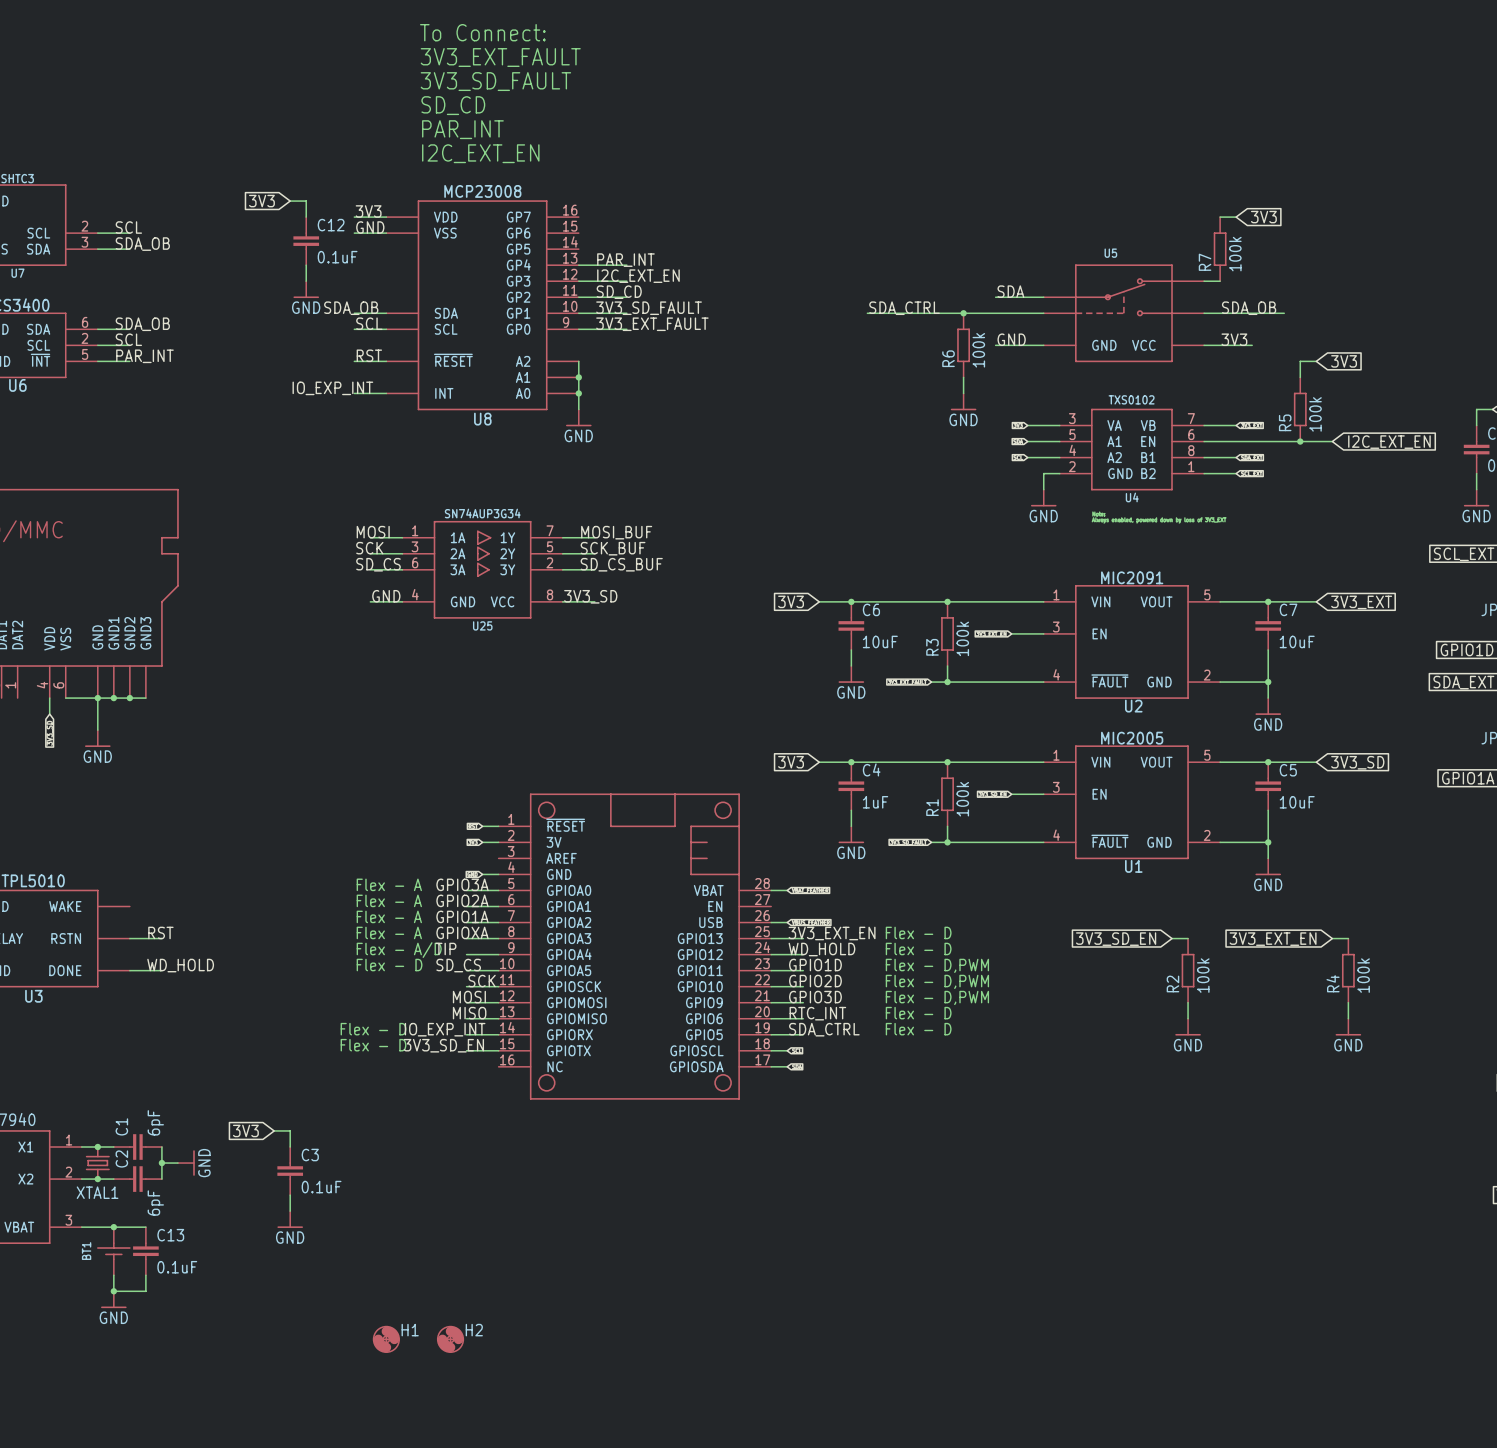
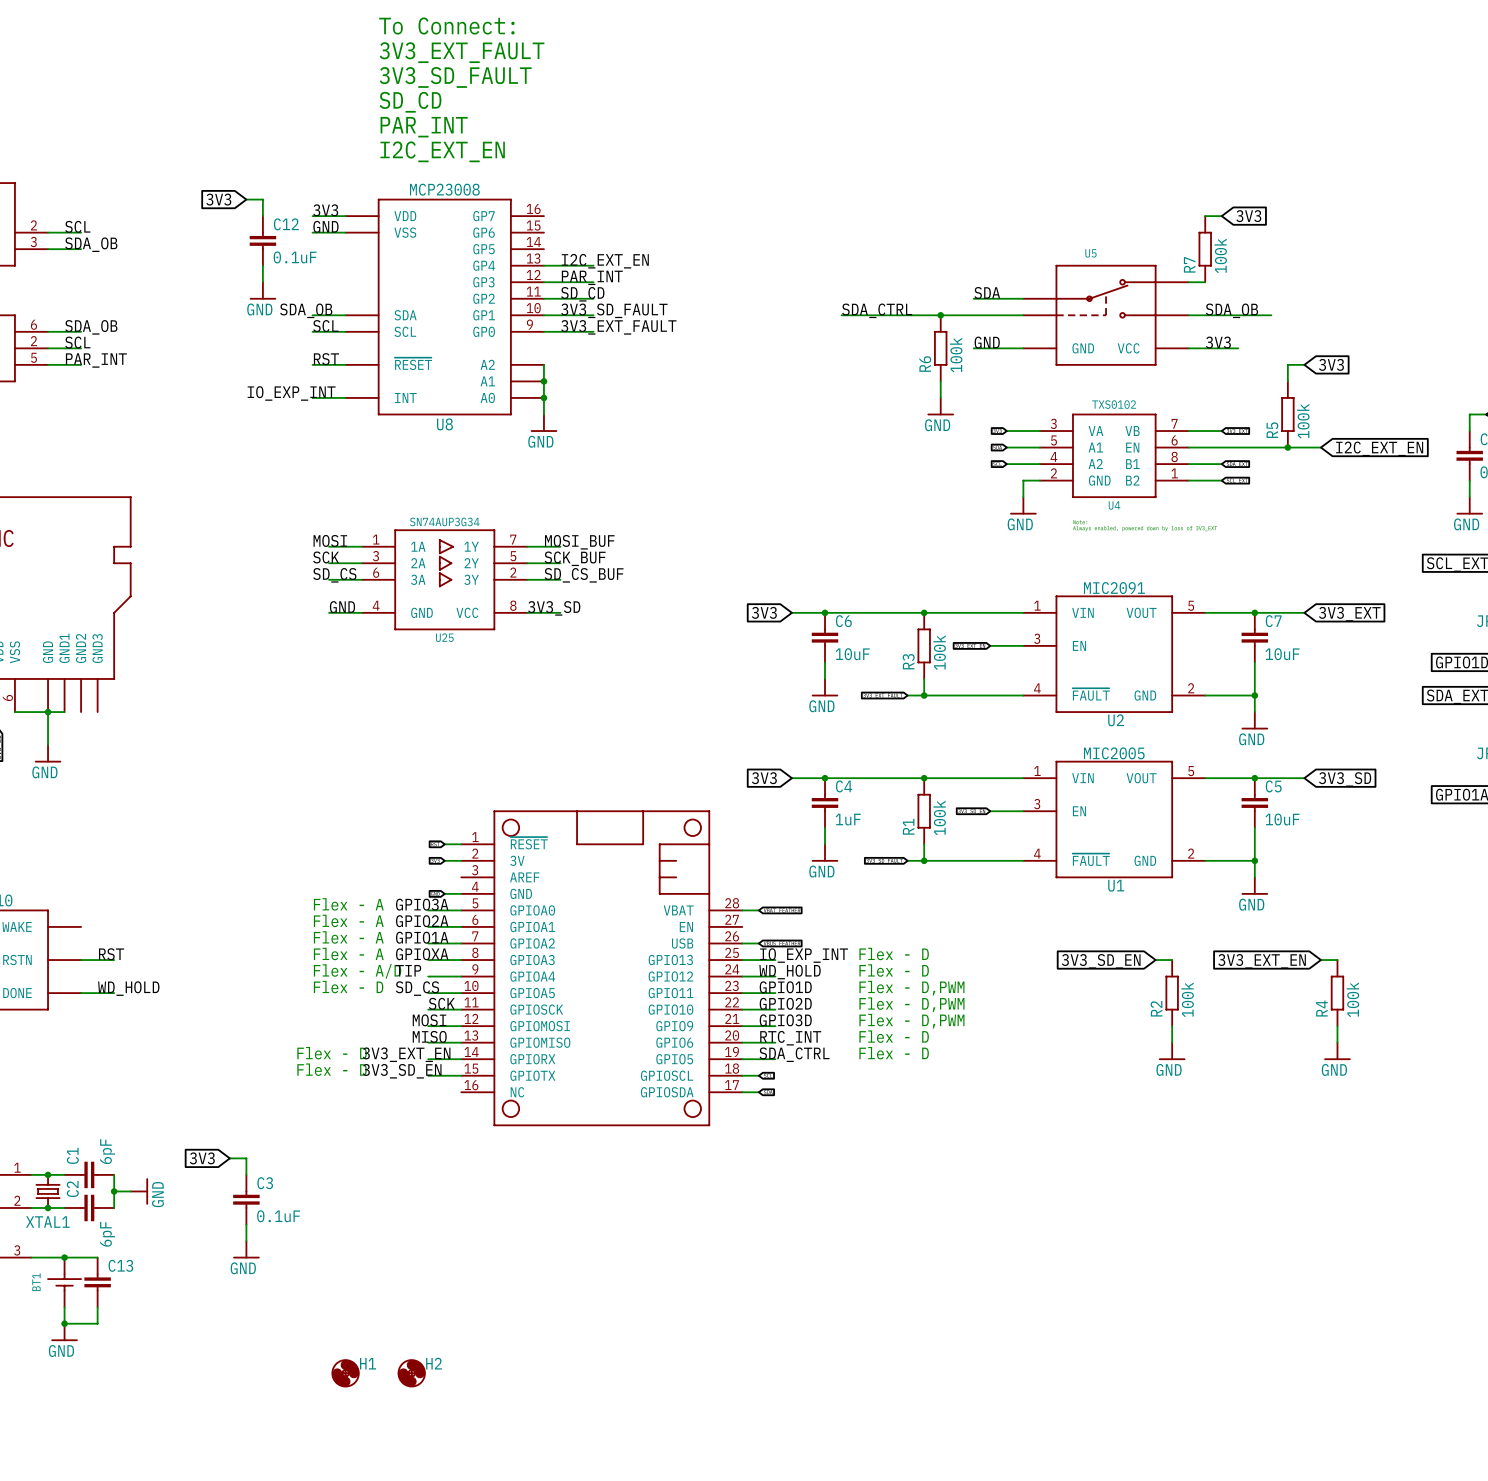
label: PAR_INT (625, 260) -> I2C_EXT_EN (605, 261)
label: I2C_EXT_EN (638, 276) -> PAR_INT (592, 277)
wire: (113, 698) (145, 698) -> none
junction: (113, 698) -> none
junction: (129, 698) -> none
label: 3V3_EXT_EN (832, 933) -> IO_EXP_INT (804, 955)
label: IO_EXP_INT (445, 1029) -> 3V3_EXT_EN (406, 1054)
C13 value: 0.1uF (177, 1267) -> none

